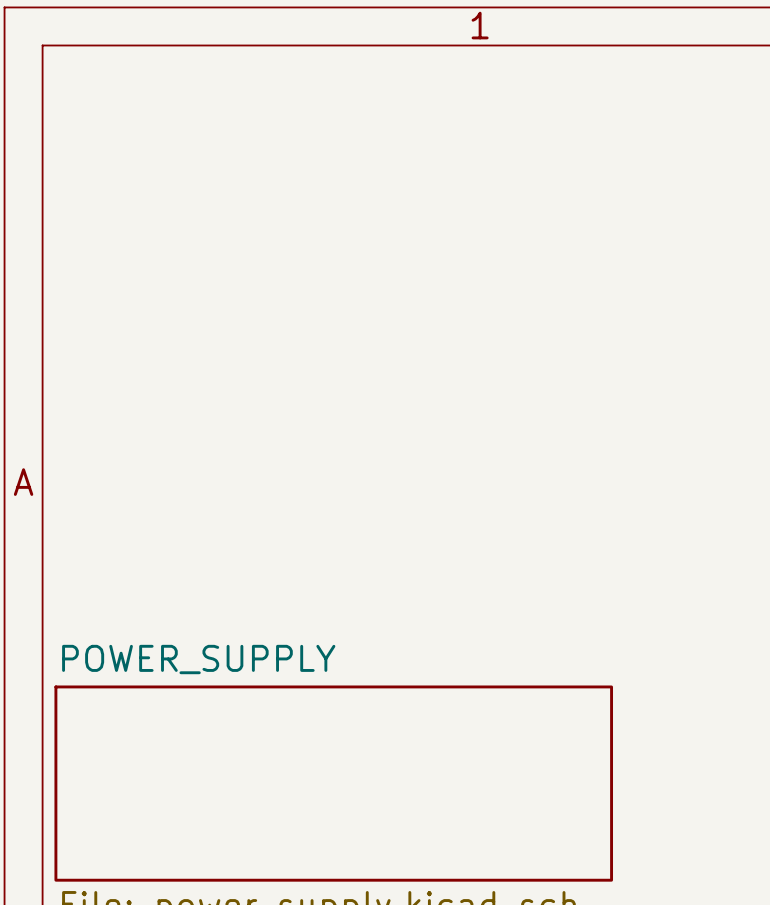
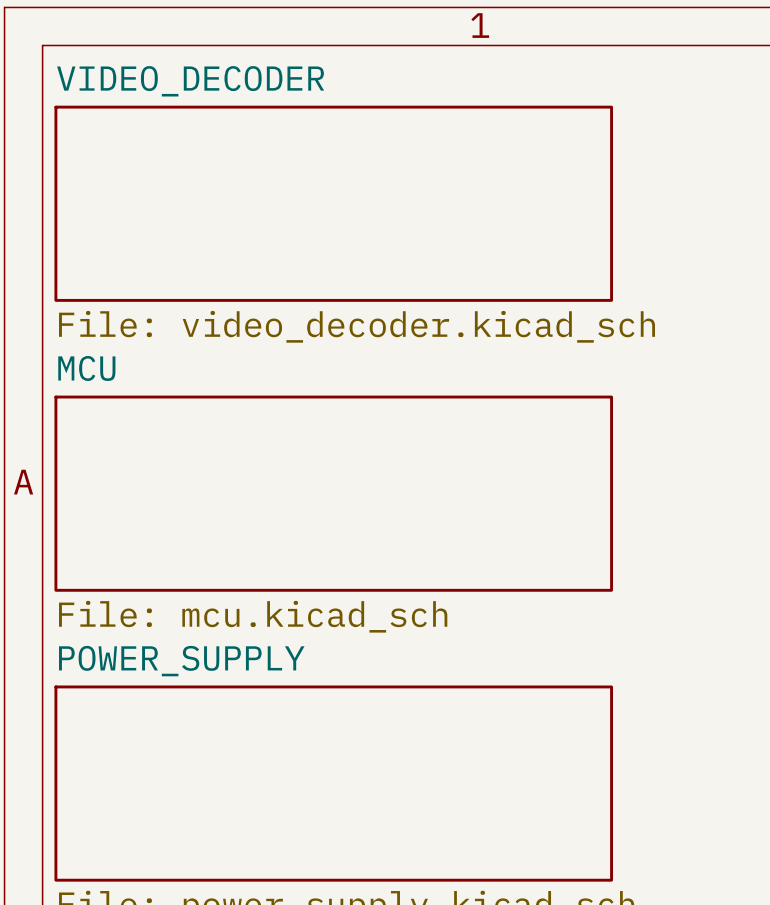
sheet VIDEO_DECODER: none -> File: video_decoder.kicad_sch (333, 203)
sheet MCU: none -> File: mcu.kicad_sch (333, 493)

